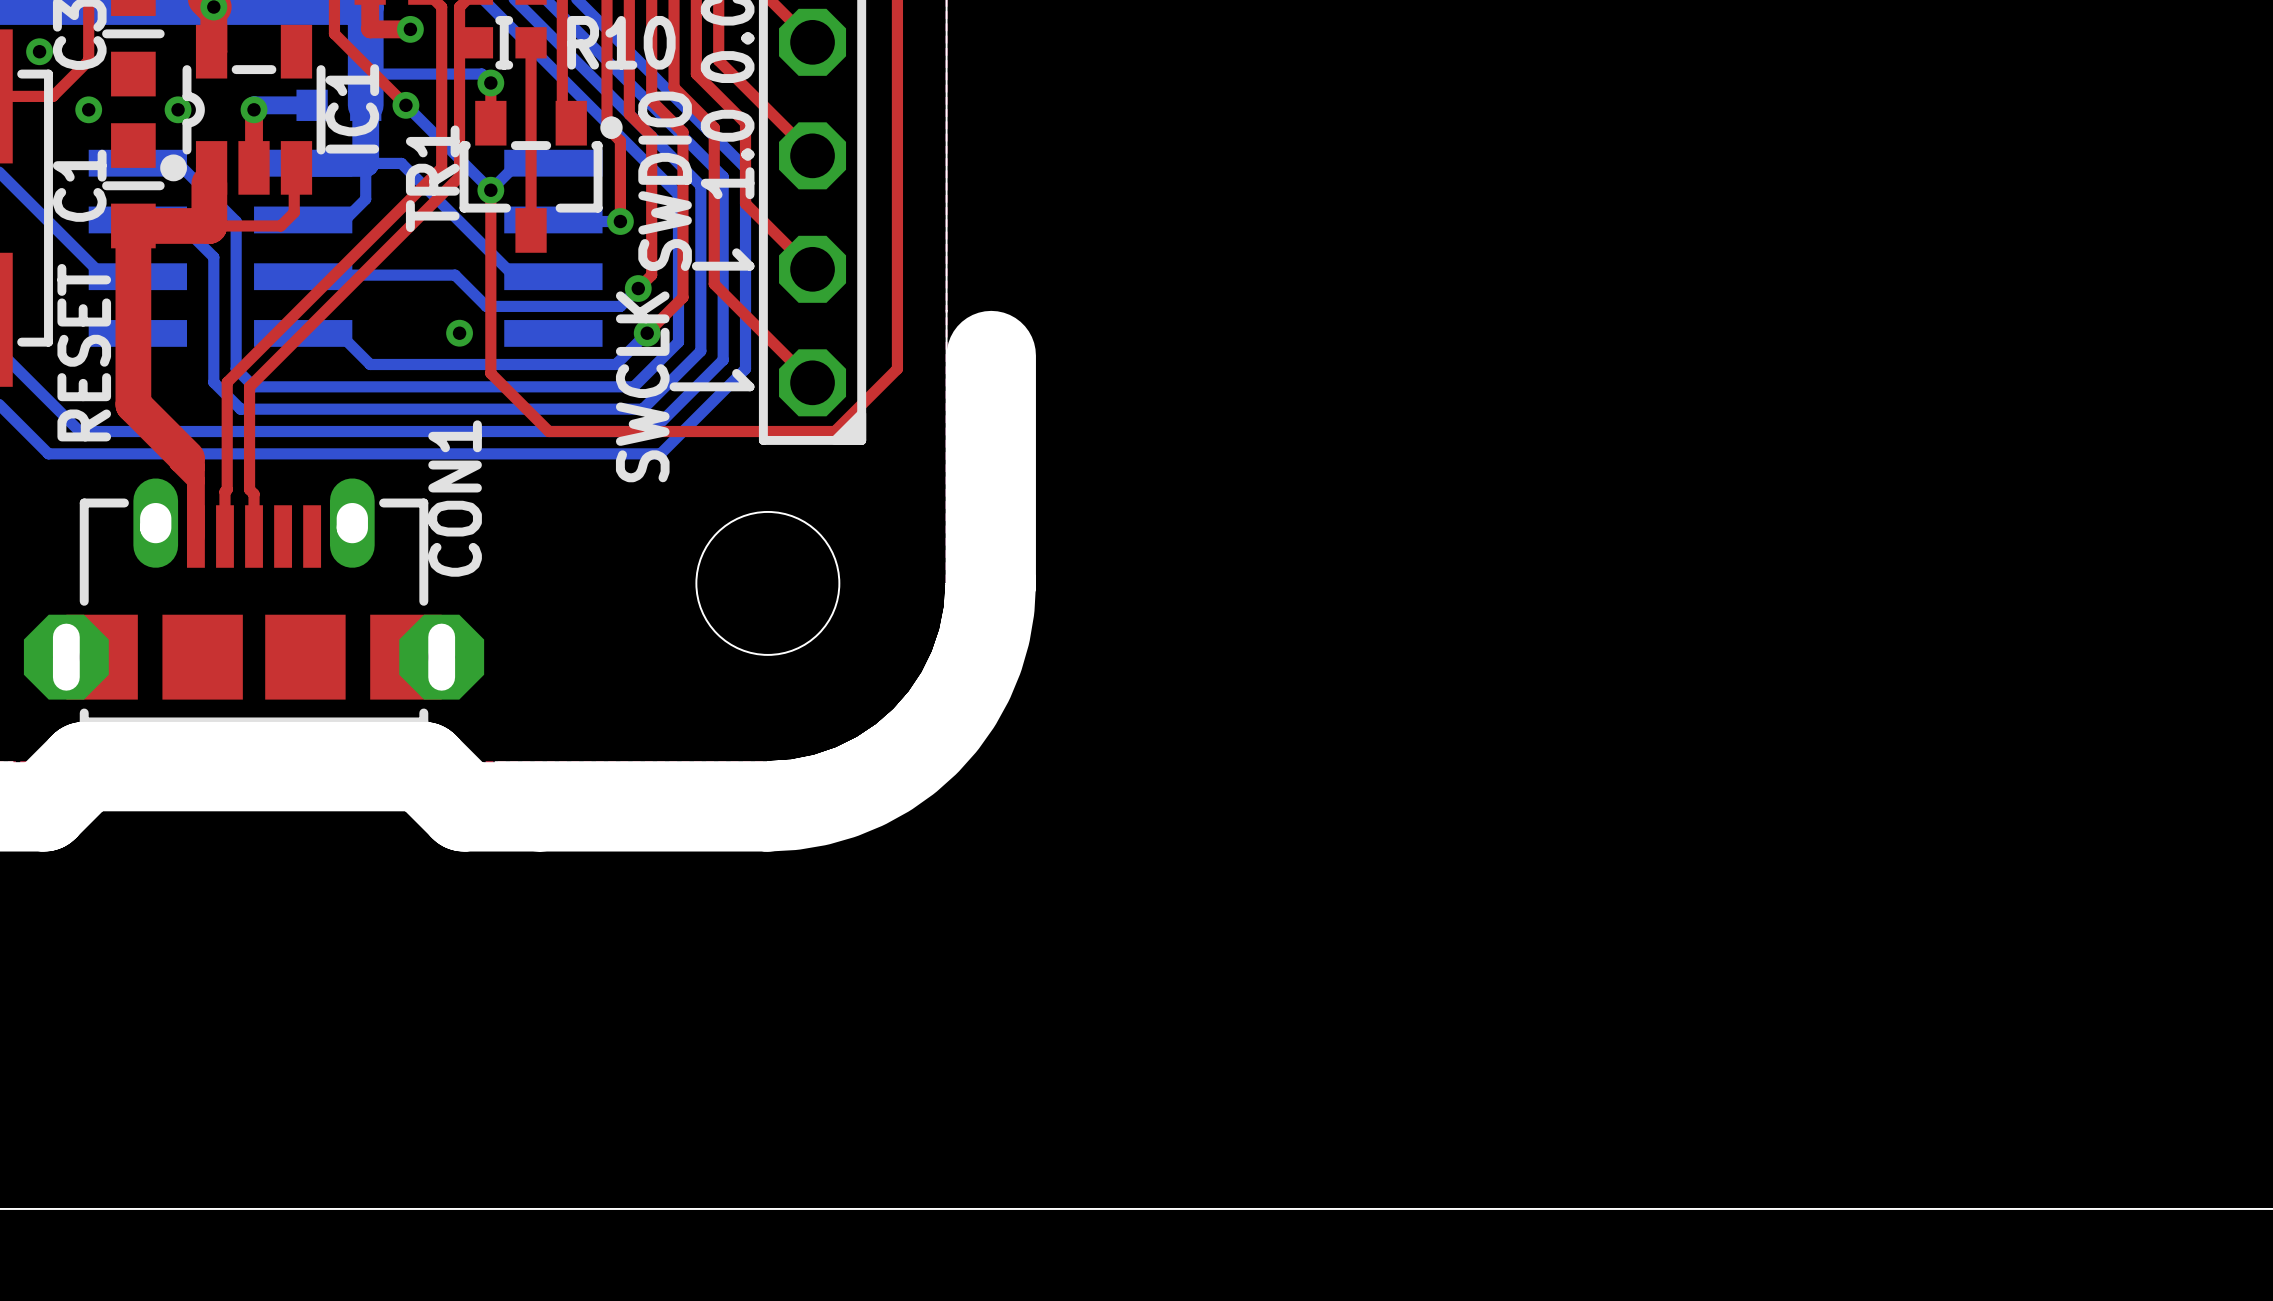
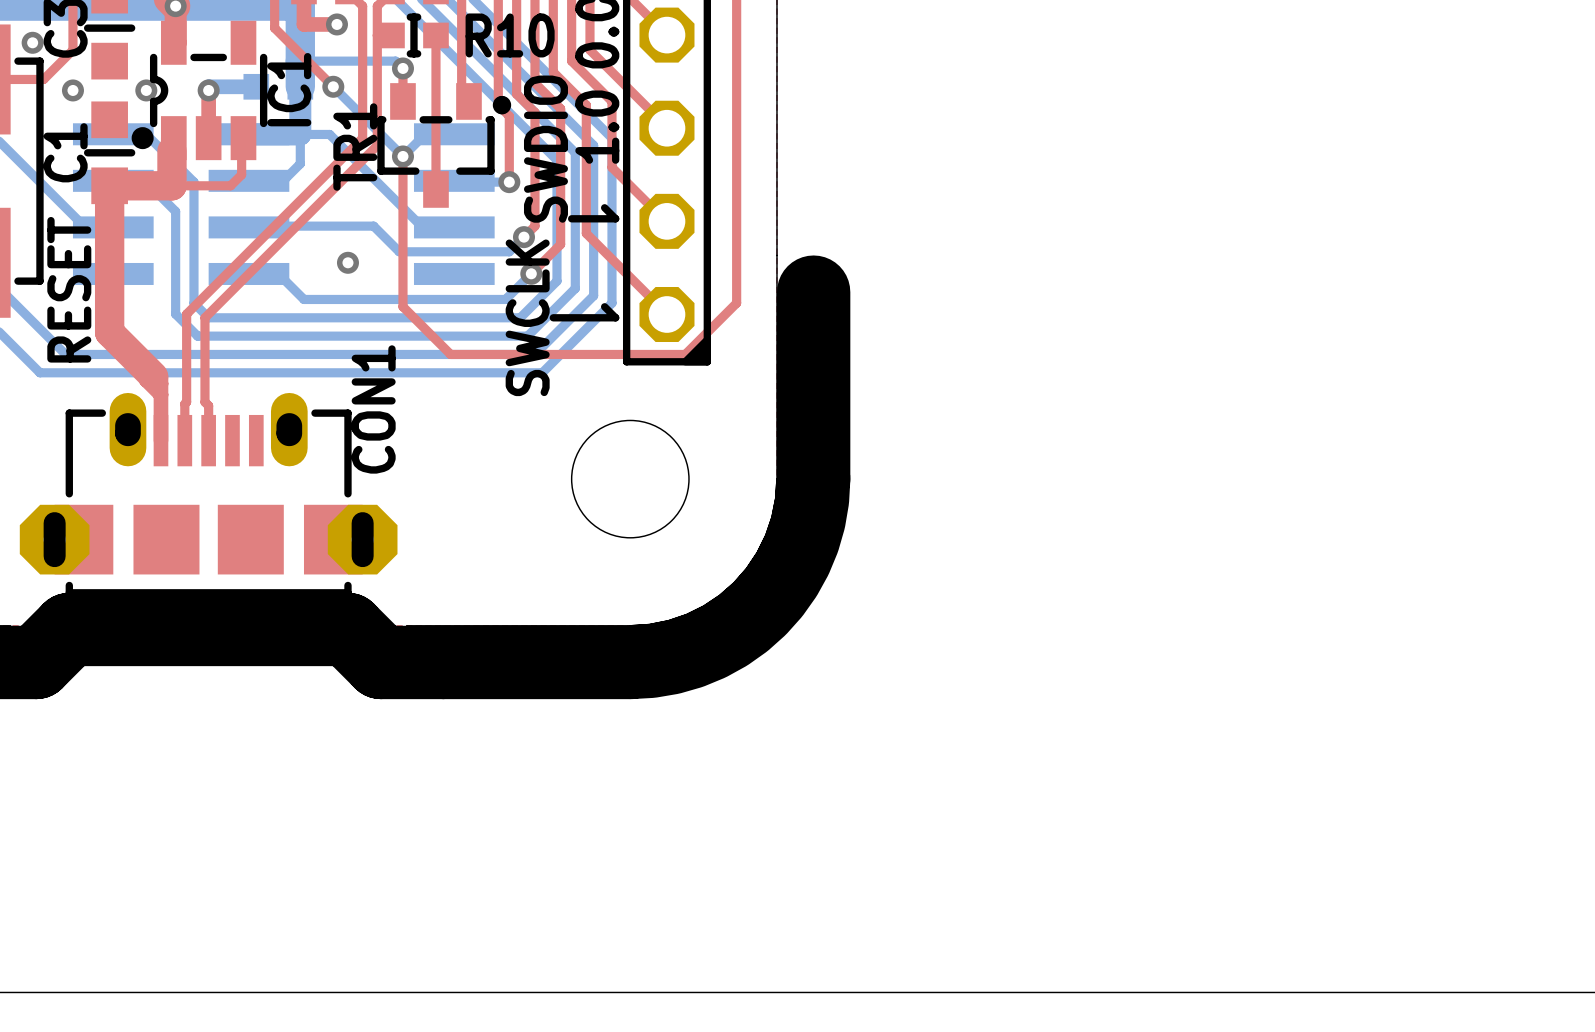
via position: (459, 333) -> (347, 262)

